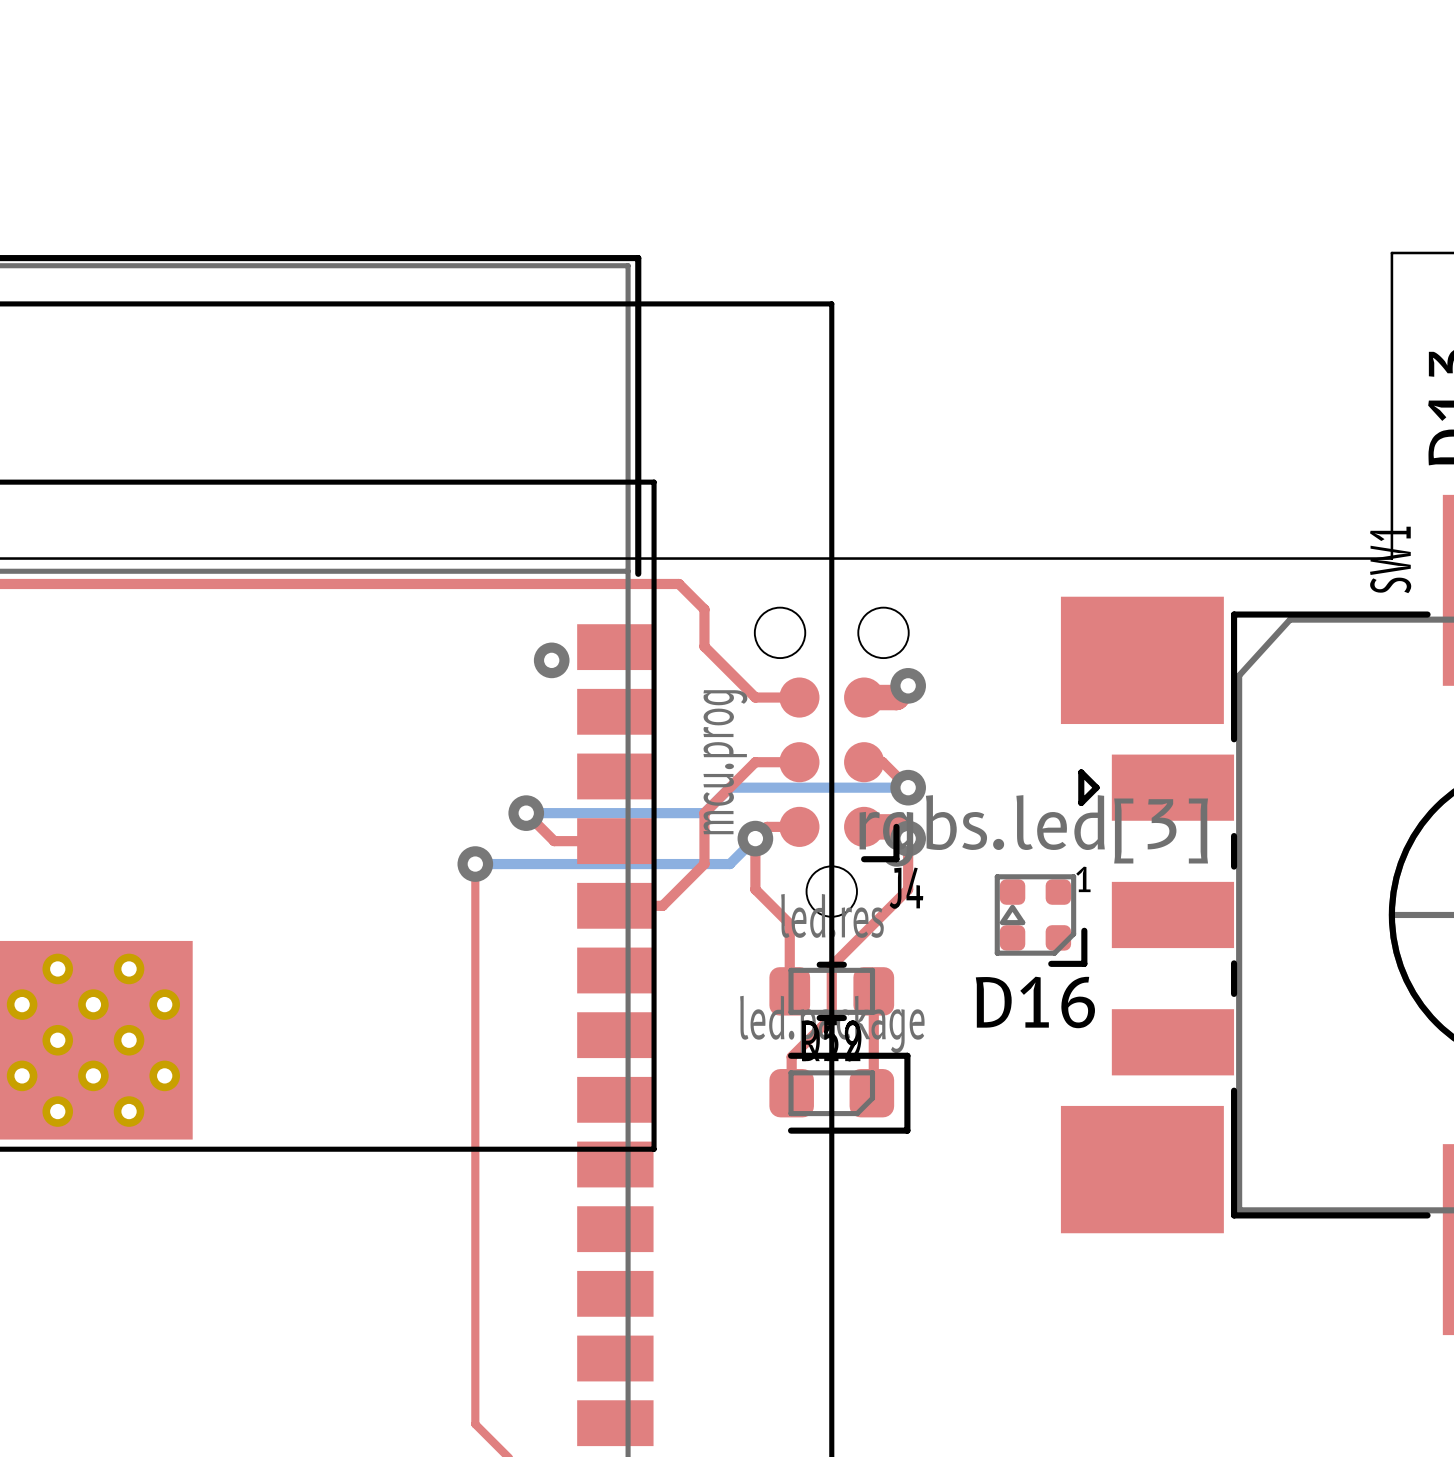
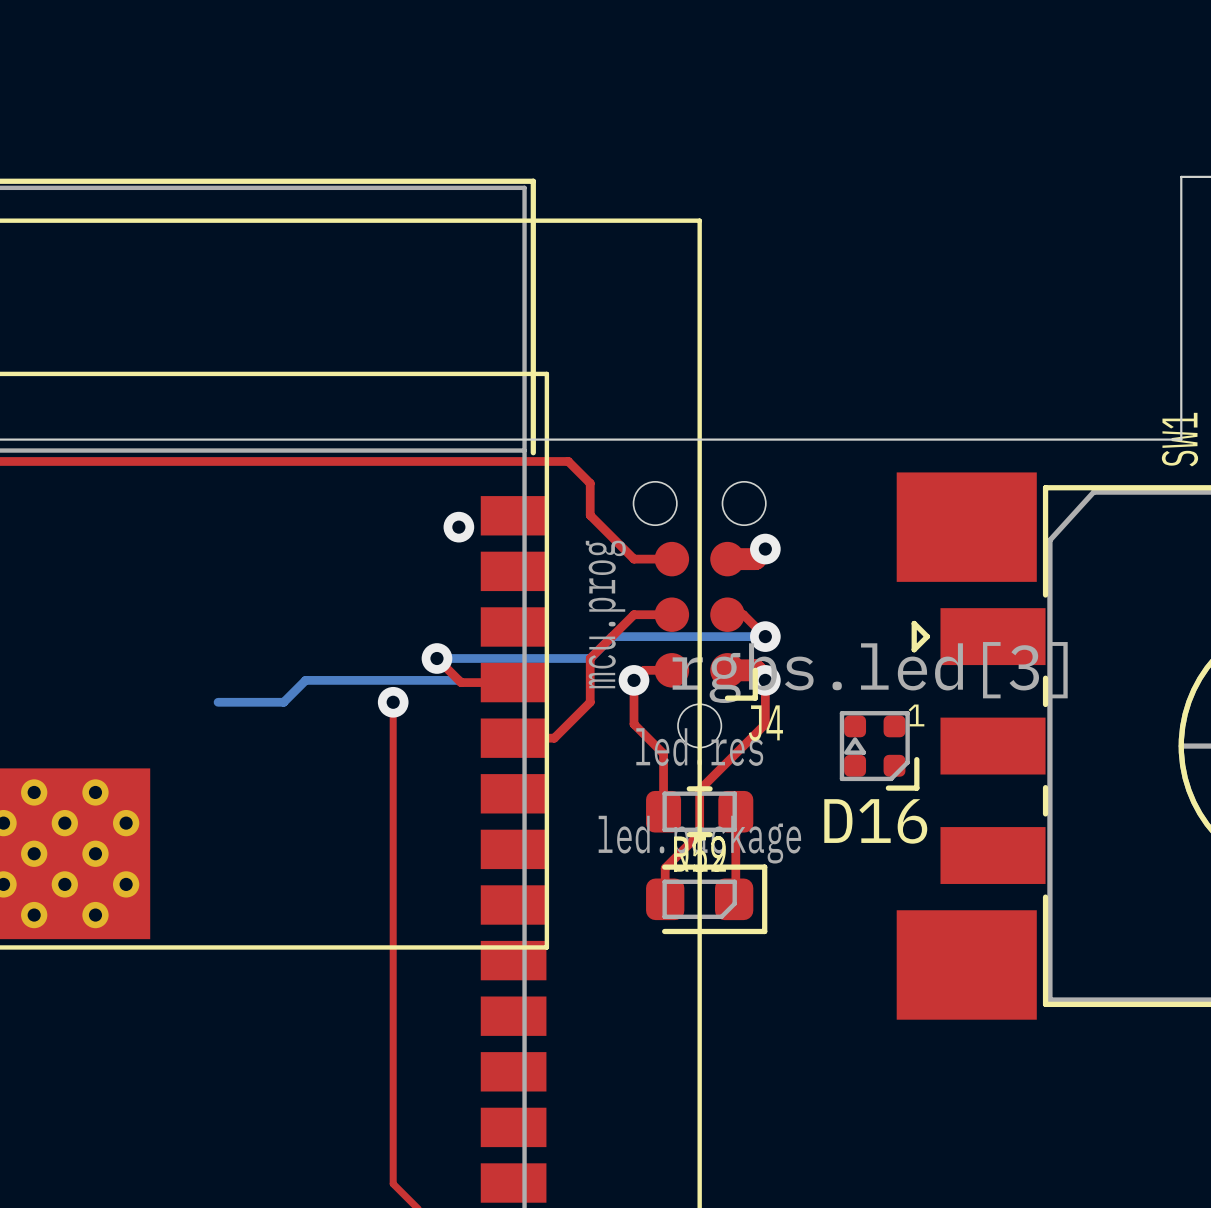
bottom track: none -> (458, 680) (305, 680) (283, 702) (218, 702)
bottom track: (755, 838) (729, 864) (475, 864) -> none

